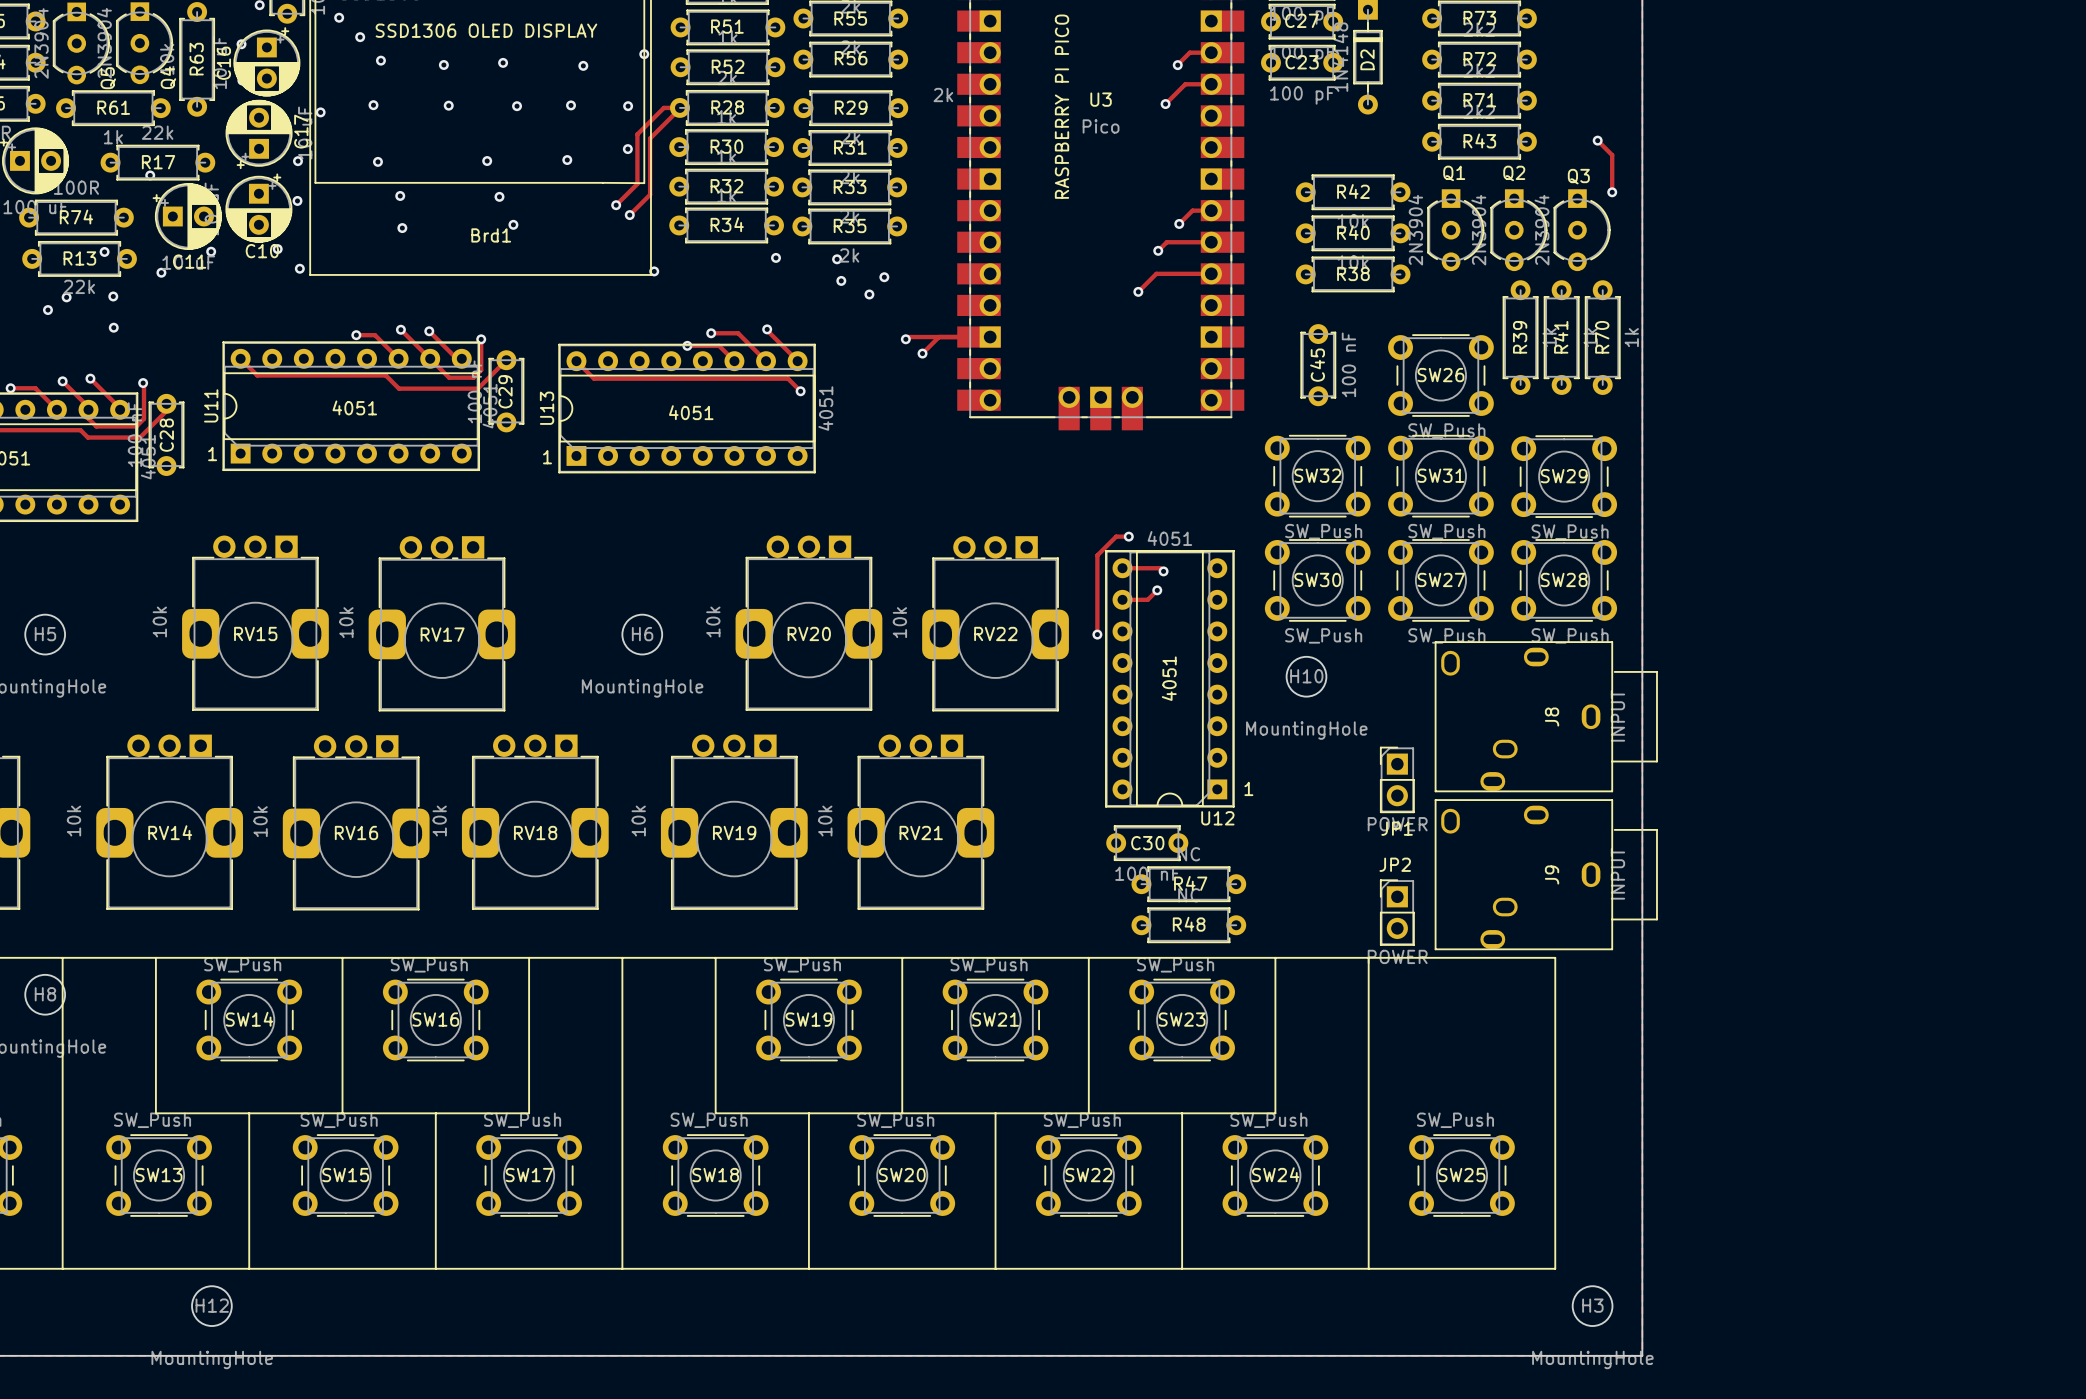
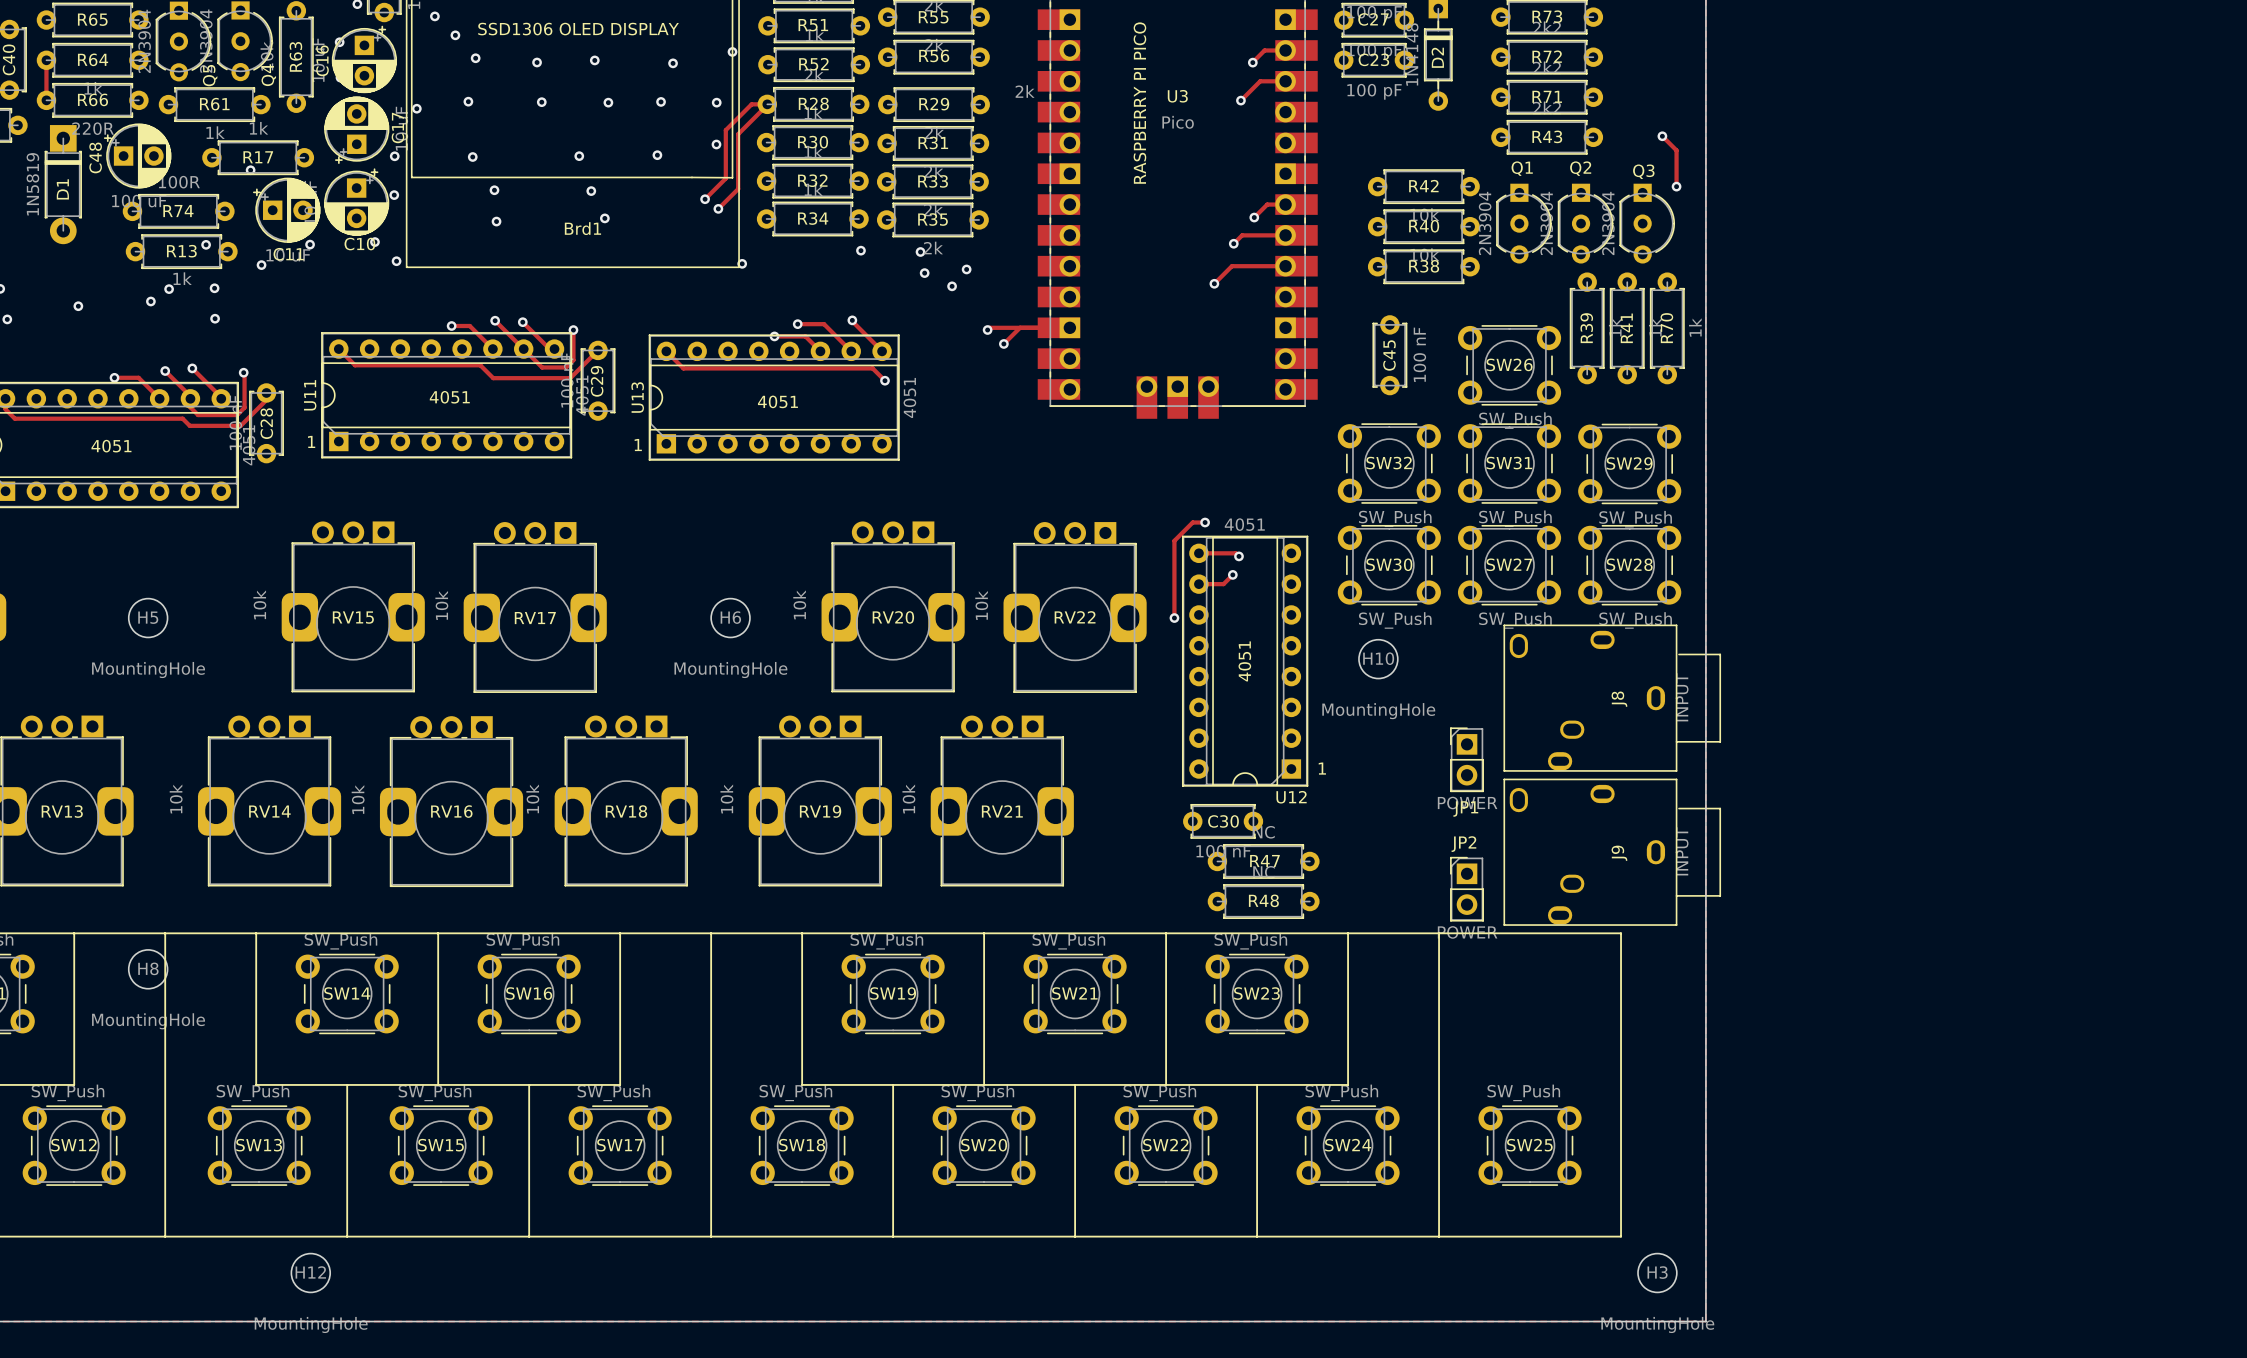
R17 value: 22k (157, 132) -> 1k (259, 128)
R13 value: 22k (79, 286) -> 1k (182, 278)

